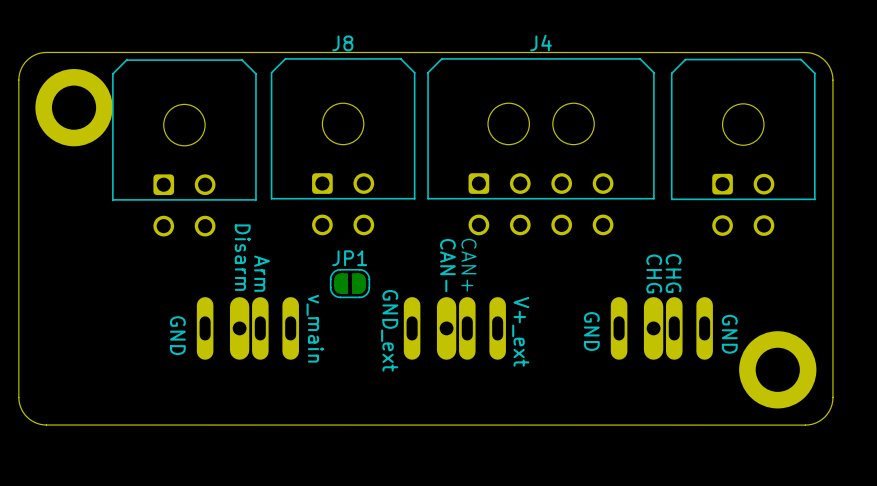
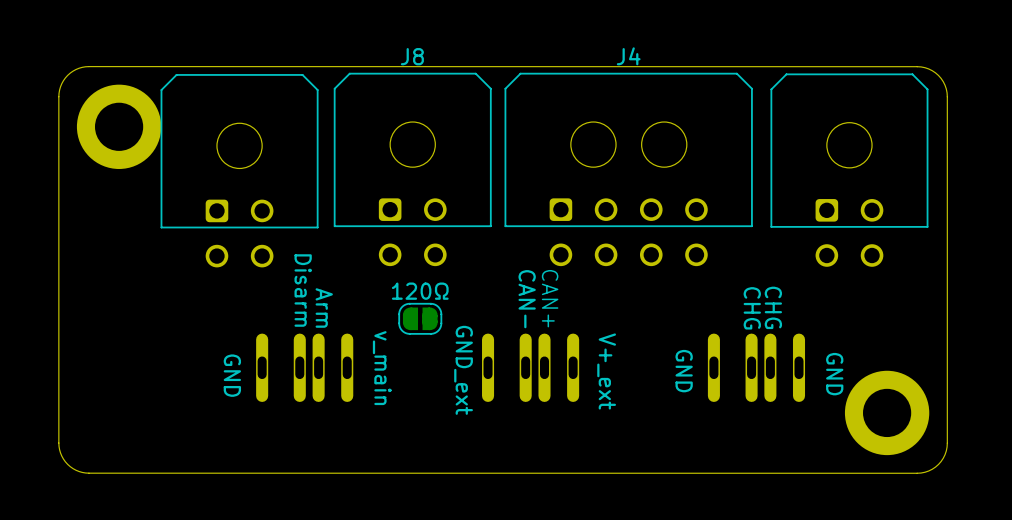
JP1 name: JP1 (349, 258) -> 120Ω (420, 291)
part footprint: [196, 297, 299, 360] -> [256, 333, 354, 402]
part footprint: [403, 297, 506, 360] -> [482, 333, 580, 402]
part footprint: [610, 297, 713, 360] -> [707, 333, 806, 402]

